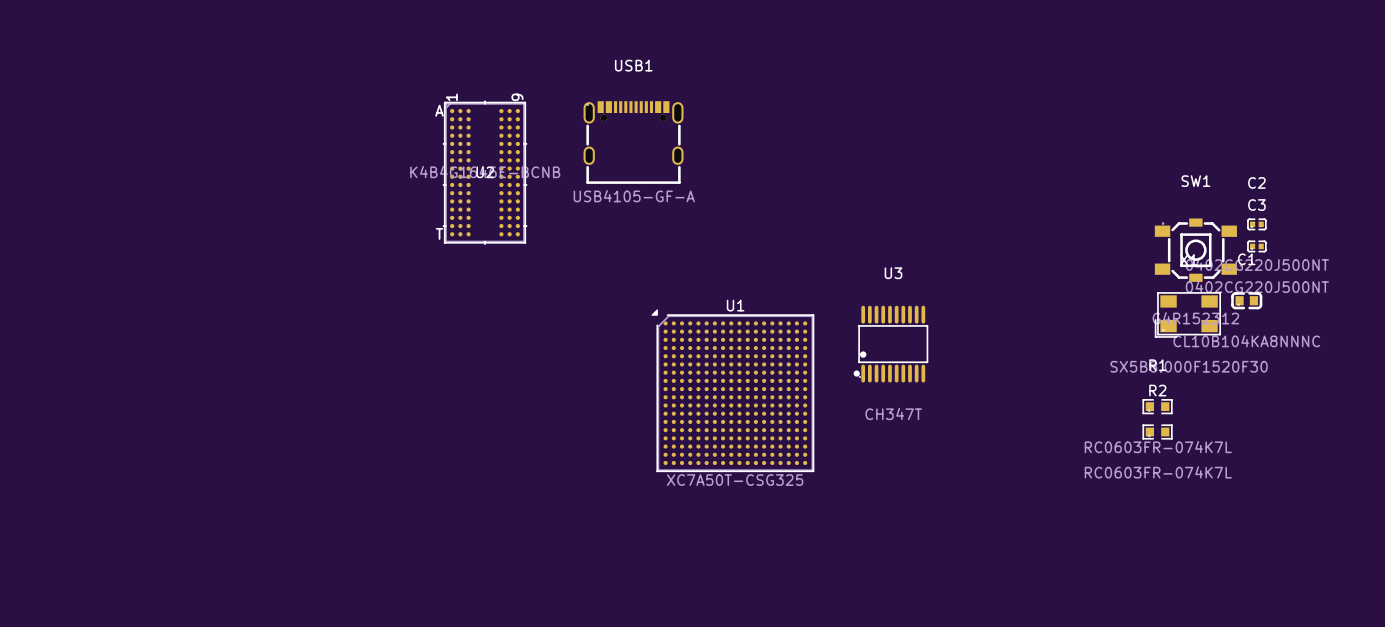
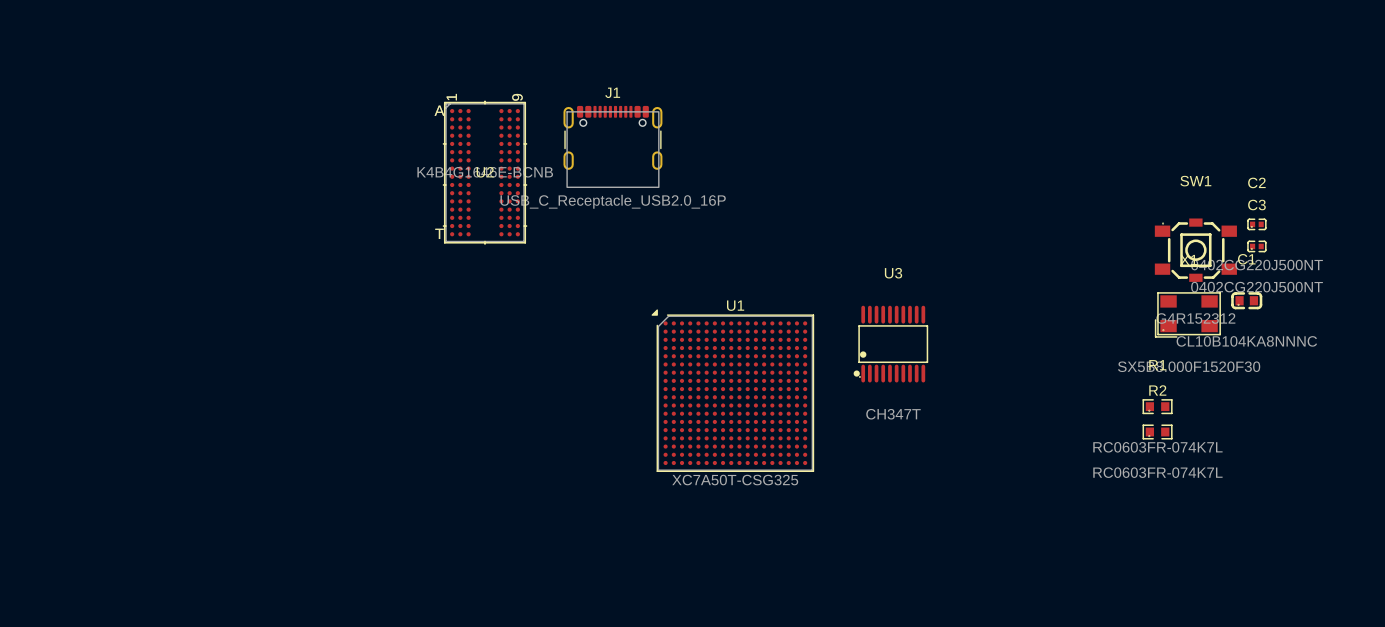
USB1: USB4105-GF-A (633, 142) -> none
J1: none -> USB_C_Receptacle_USB2.0_16P (612, 146)

